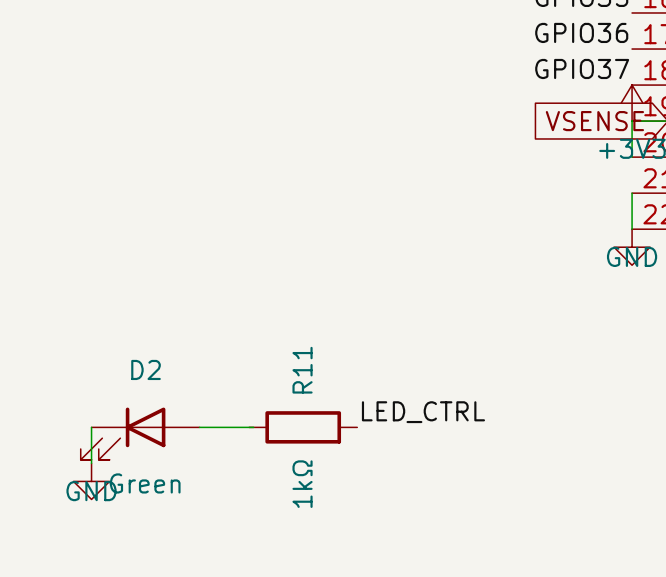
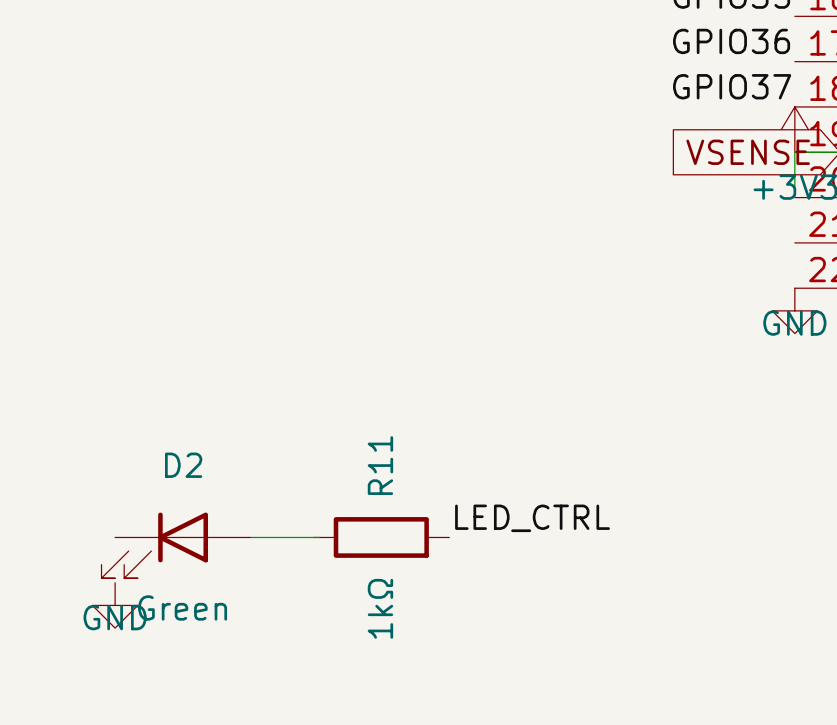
wire: (632, 193) (632, 229) -> none
wire: (91, 427) (91, 463) -> none

